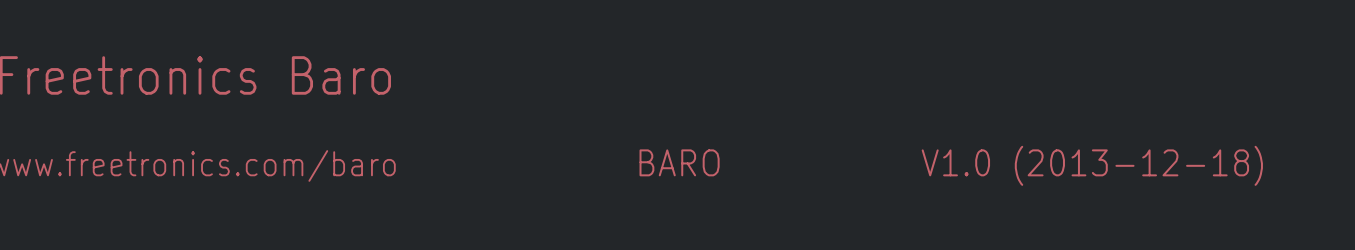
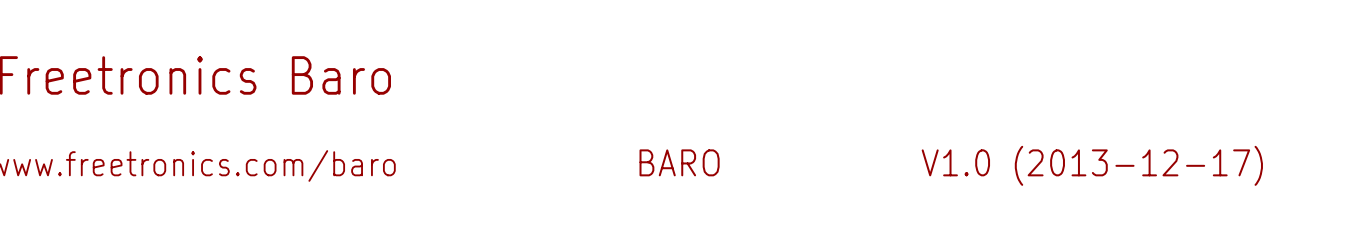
text: V1.0 (2013-12-18) (1092, 165) -> V1.0 (2013-12-17) (1092, 165)

